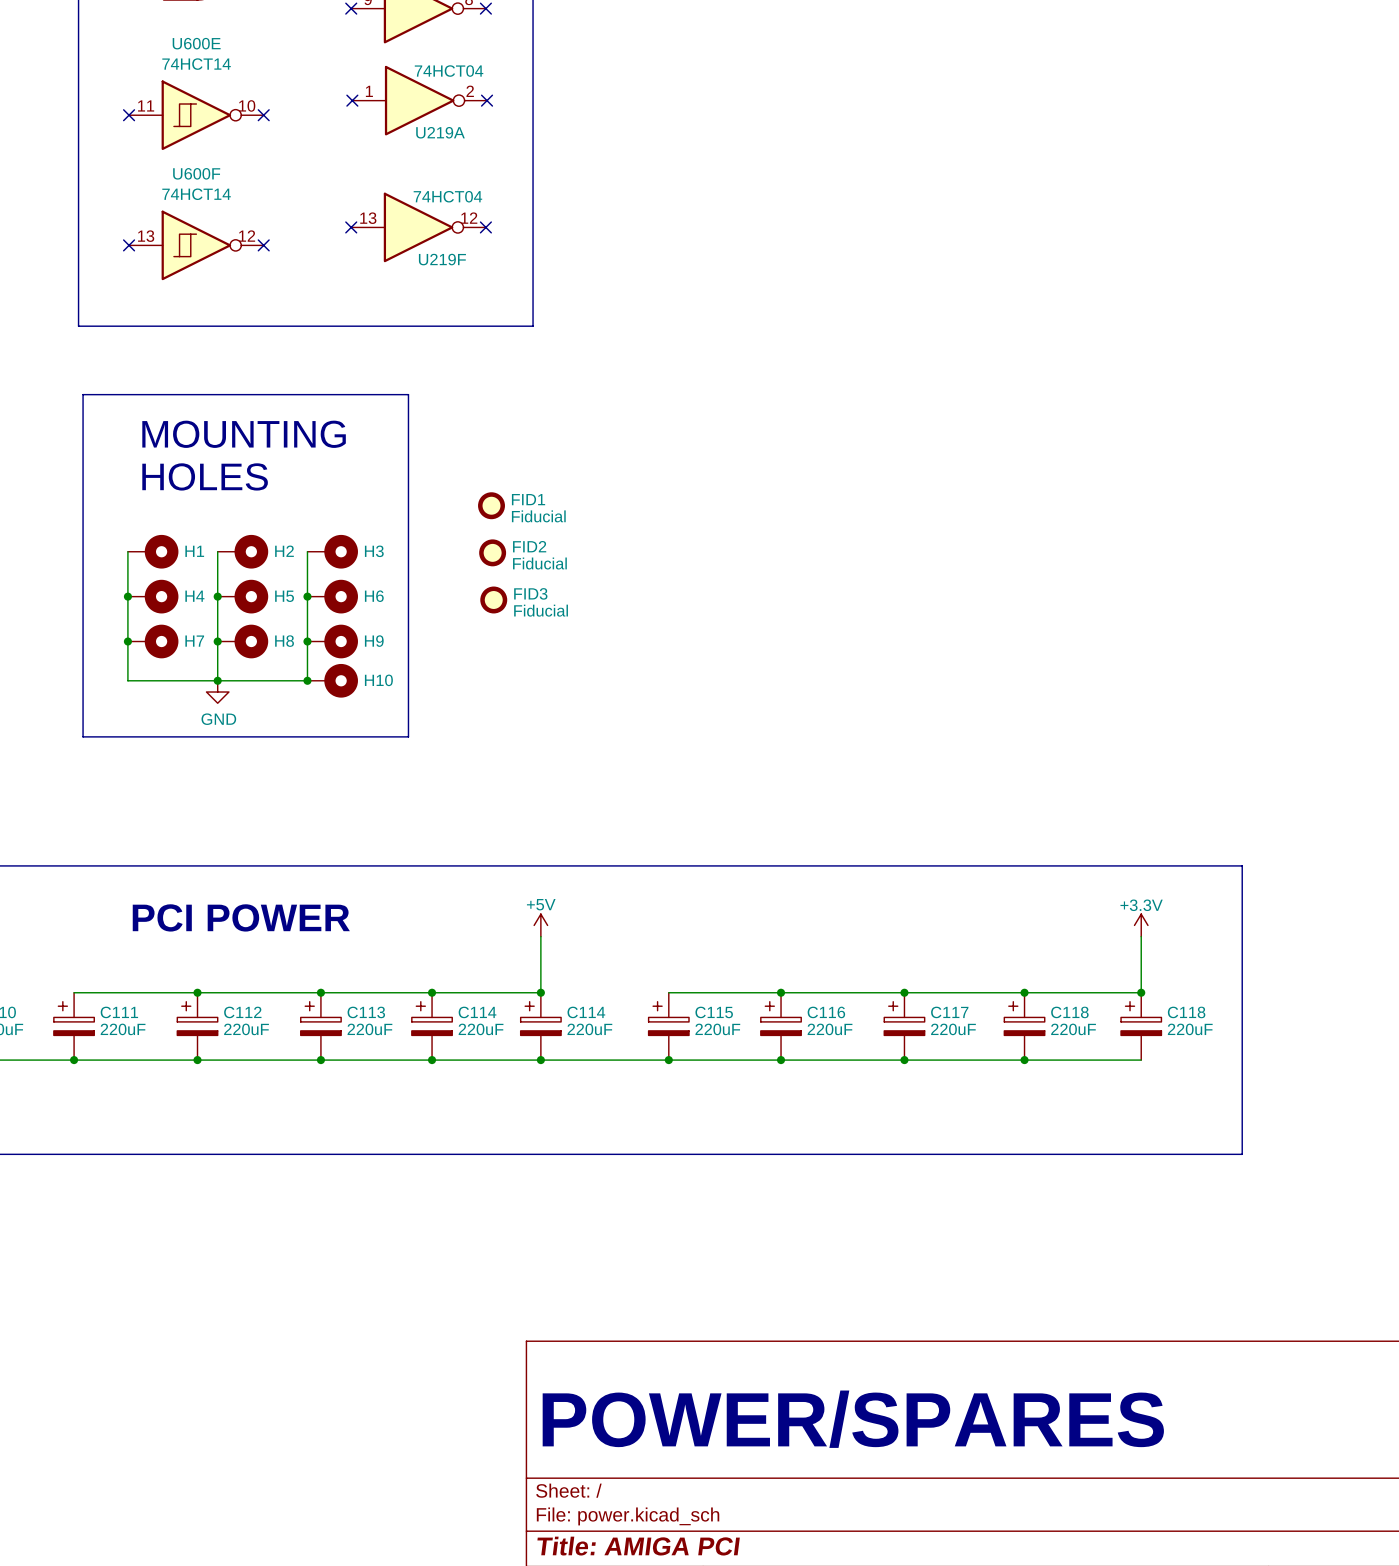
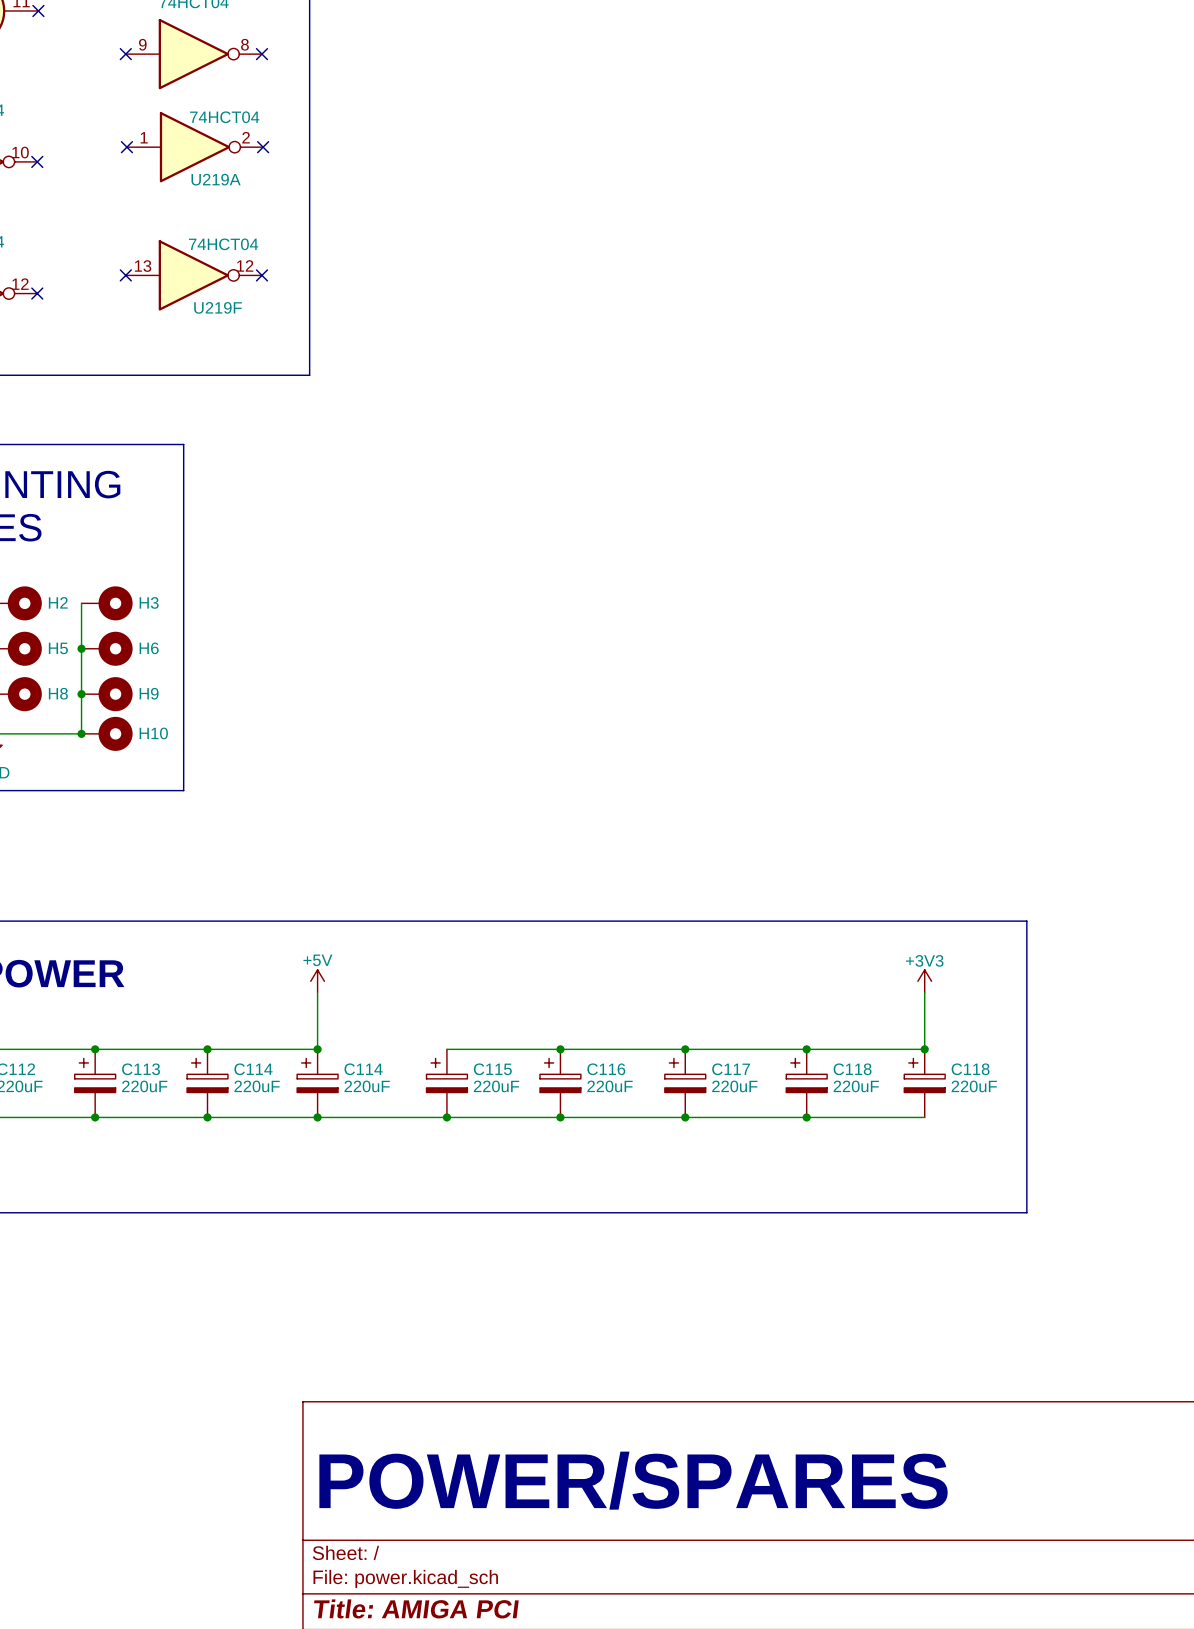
FID1: Fiducial (491, 505) -> none
FID2: Fiducial (492, 552) -> none
FID3: Fiducial (493, 599) -> none
power symbol: +3.3V (1141, 925) -> +3V3 (924, 981)

